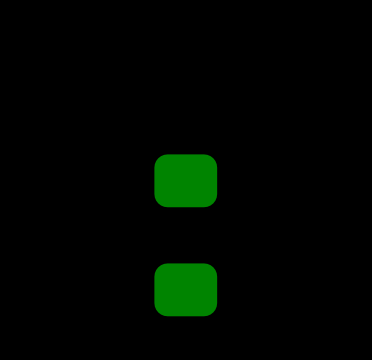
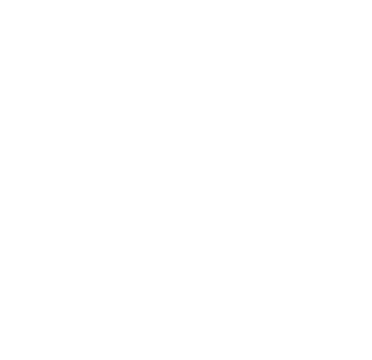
part: (185, 235) -> none

